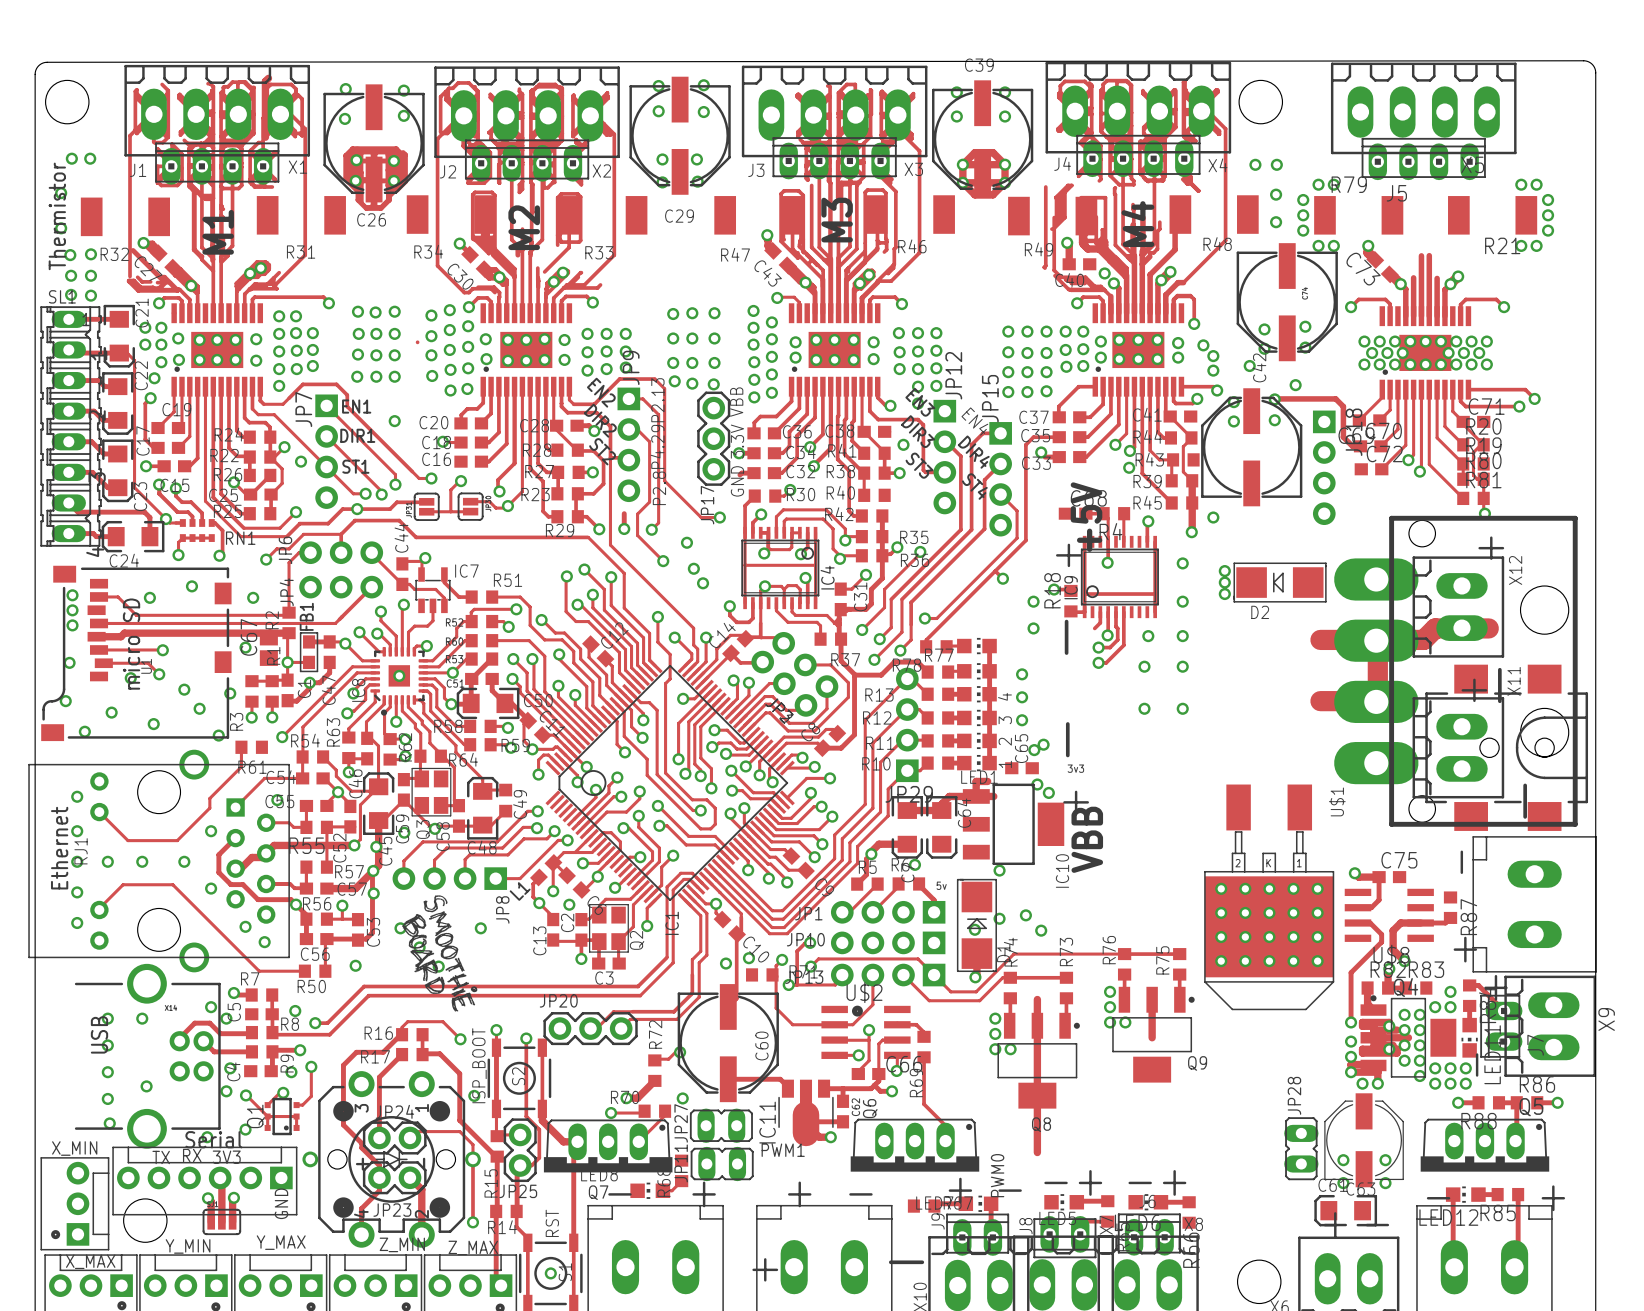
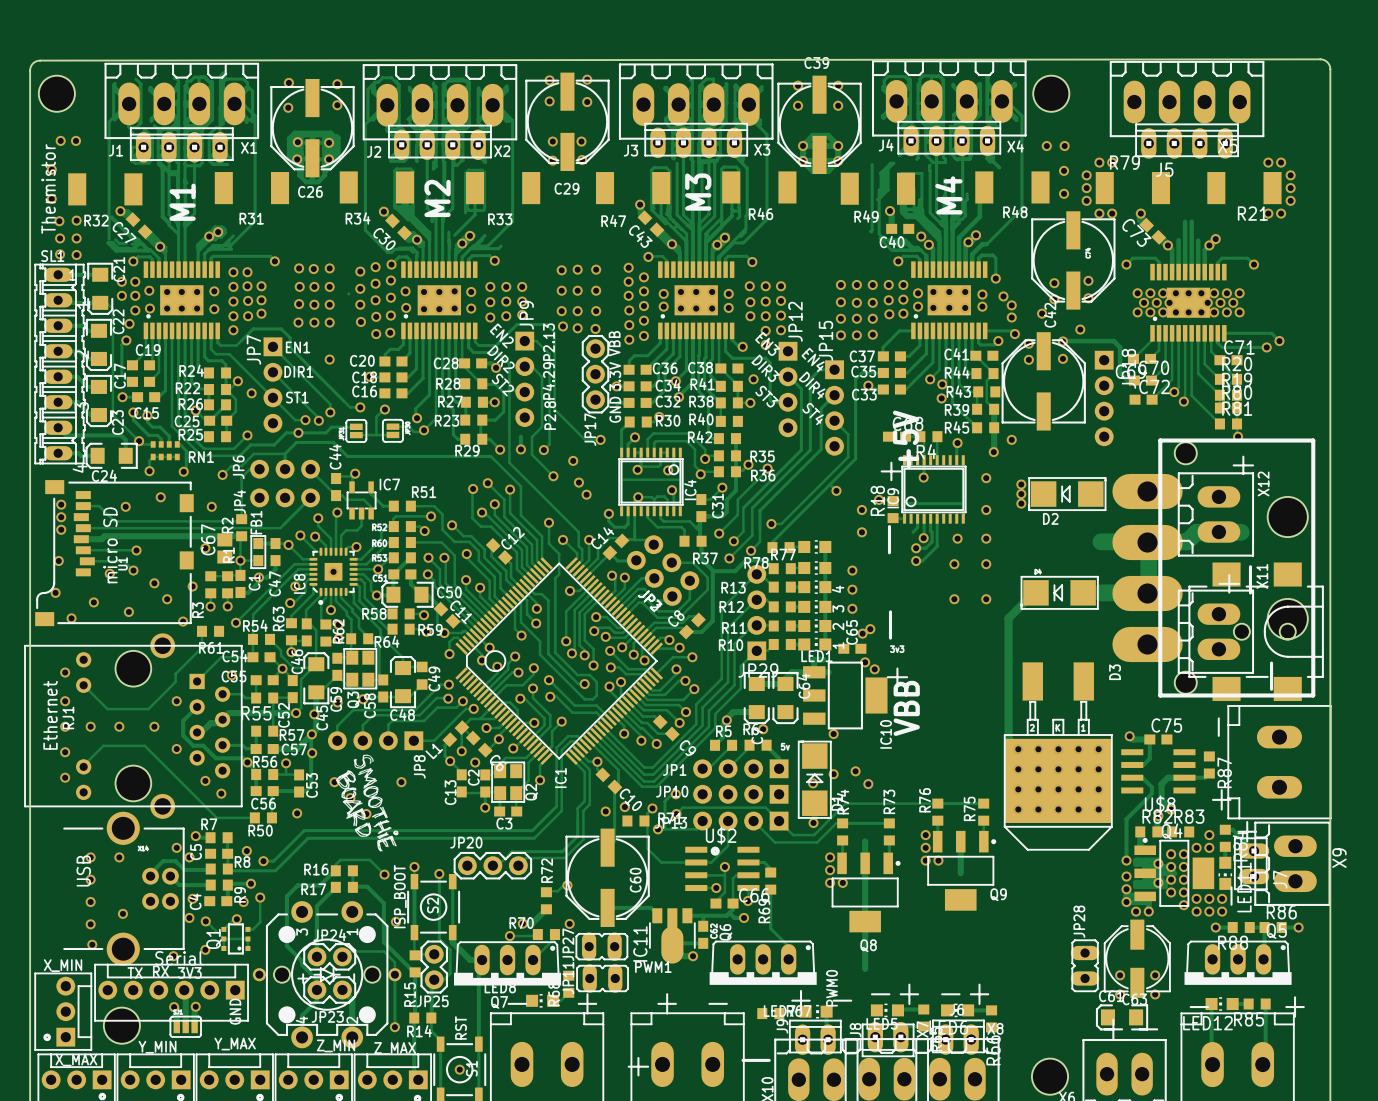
track: none -> (1035, 592) (1008, 618) (1008, 739) (1018, 749)
part: none -> (1059, 592)
U$1 name: U$1 (1337, 801) -> D3 (1115, 672)

